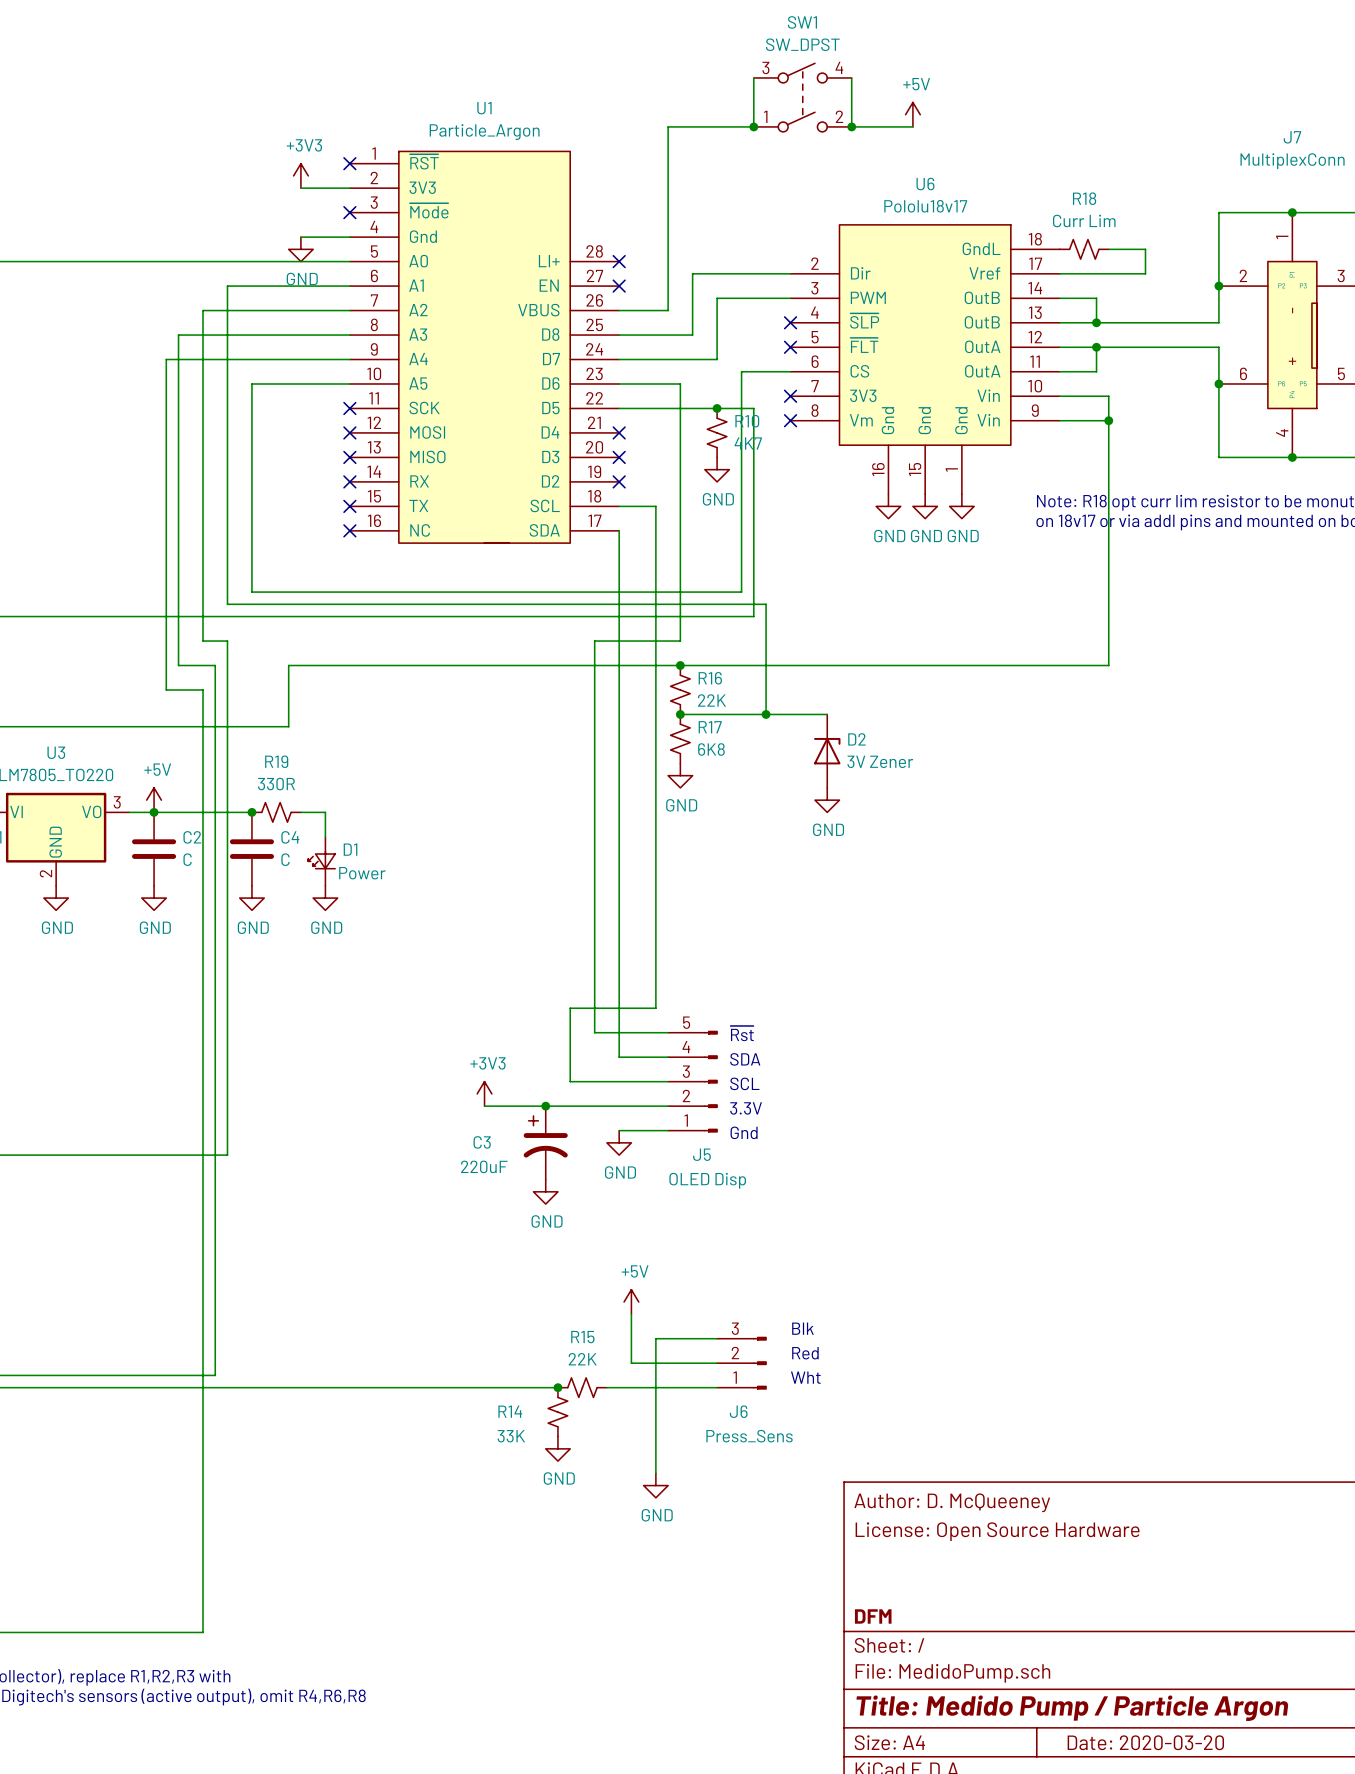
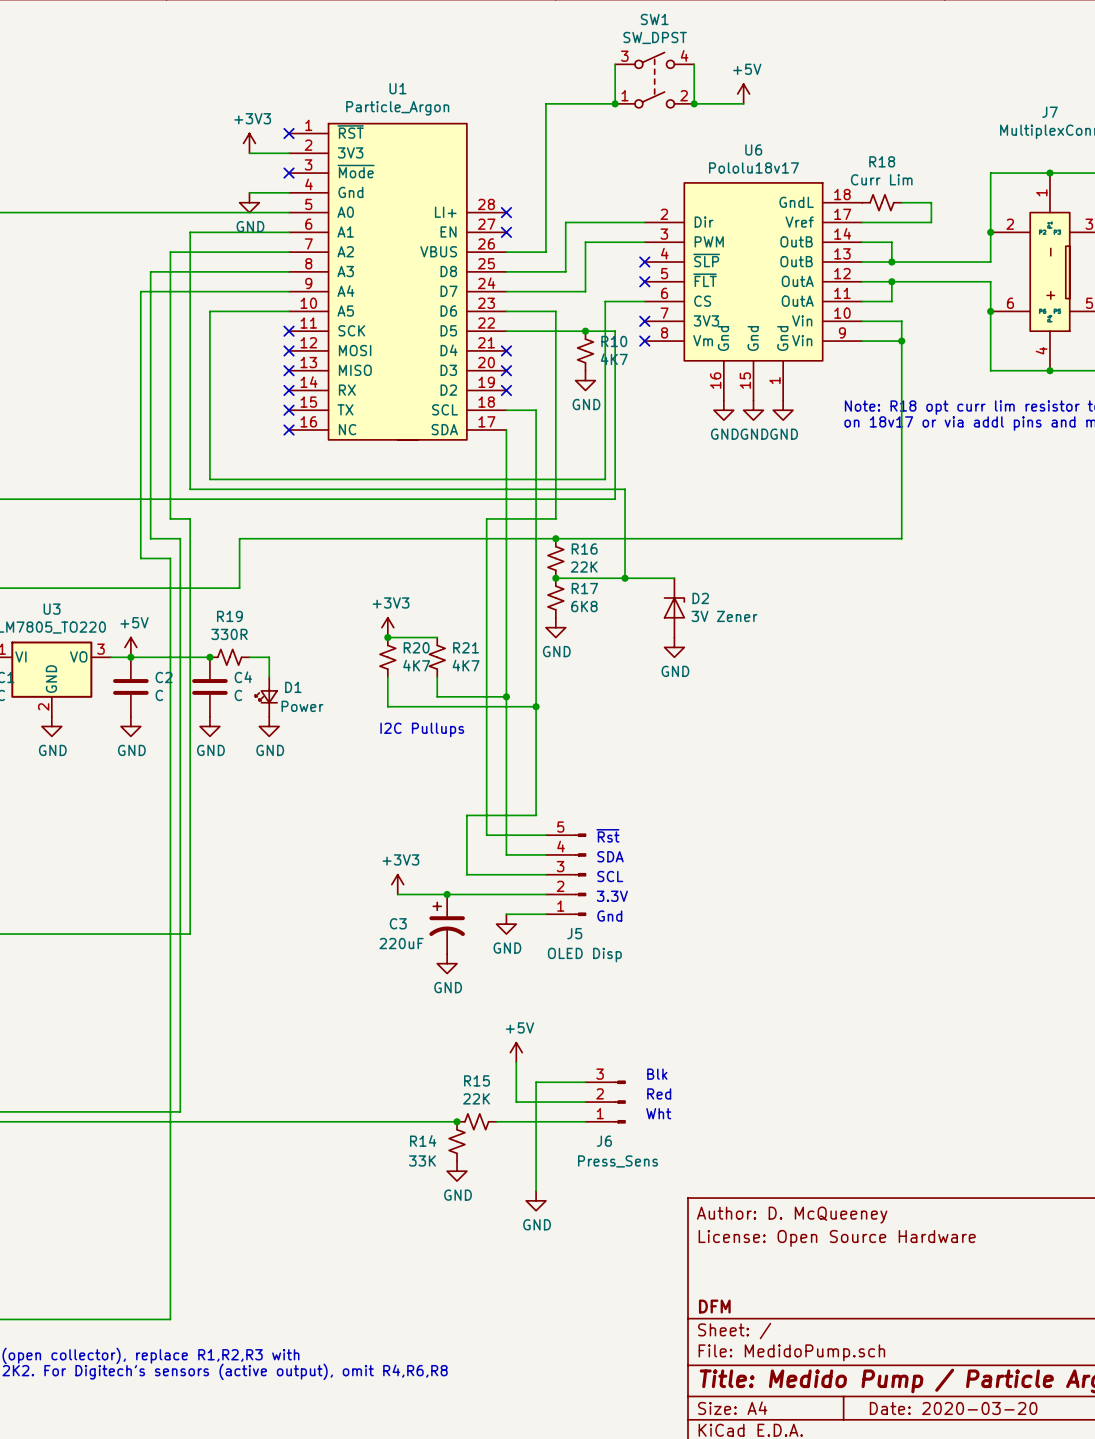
power symbol: none -> +3V3 (387, 627)
wire: none -> (387, 637) (437, 637)
junction: none -> (387, 637)
R20: none -> 4K7 (387, 657)
R21: none -> 4K7 (437, 657)
wire: none -> (387, 677) (387, 706) (536, 706)
wire: none -> (437, 677) (437, 696) (506, 696)
junction: none -> (506, 696)
junction: none -> (536, 706)
text: none -> I2C Pullups (422, 729)

